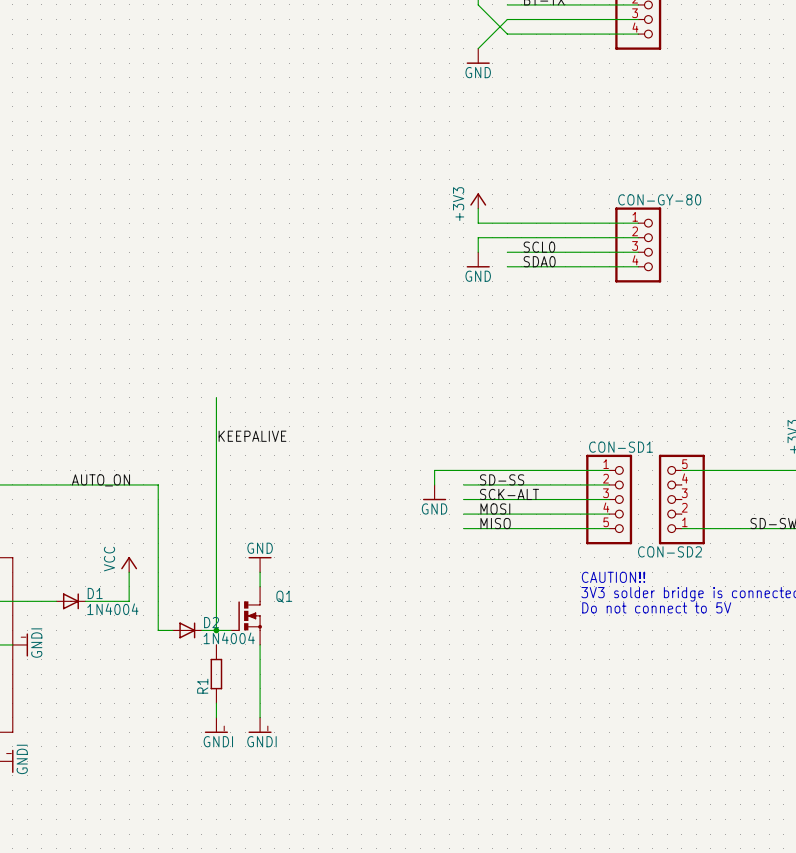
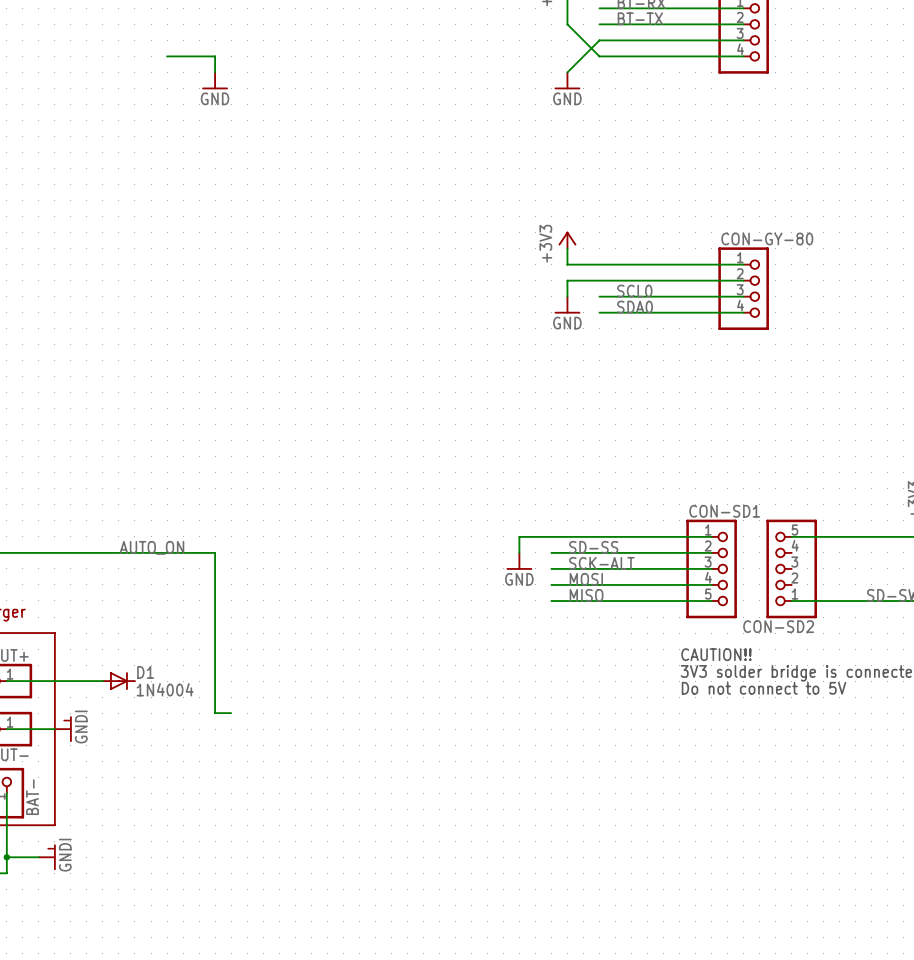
wire: none -> (167, 56) (215, 56) (215, 72)
power symbol: none -> GND (215, 80)
wire: (216, 397) (216, 630) -> none
label: KEEPALIVE (252, 436) -> none
power symbol: VCC (129, 564) -> none
power symbol: GND (260, 564) -> none
wire: (129, 572) (129, 601) (85, 601) -> none
wire: (260, 572) (260, 586) -> none
Q1: (246, 615) -> none
D2: 1N4004 (187, 630) -> none
wire: (201, 630) (230, 630) -> none
junction: (216, 630) -> none
wire: (260, 644) (260, 717) -> none
R1: (216, 674) -> none
wire: (216, 703) (216, 717) -> none
power symbol: GNDI (216, 725) -> none
power symbol: GNDI (260, 725) -> none

